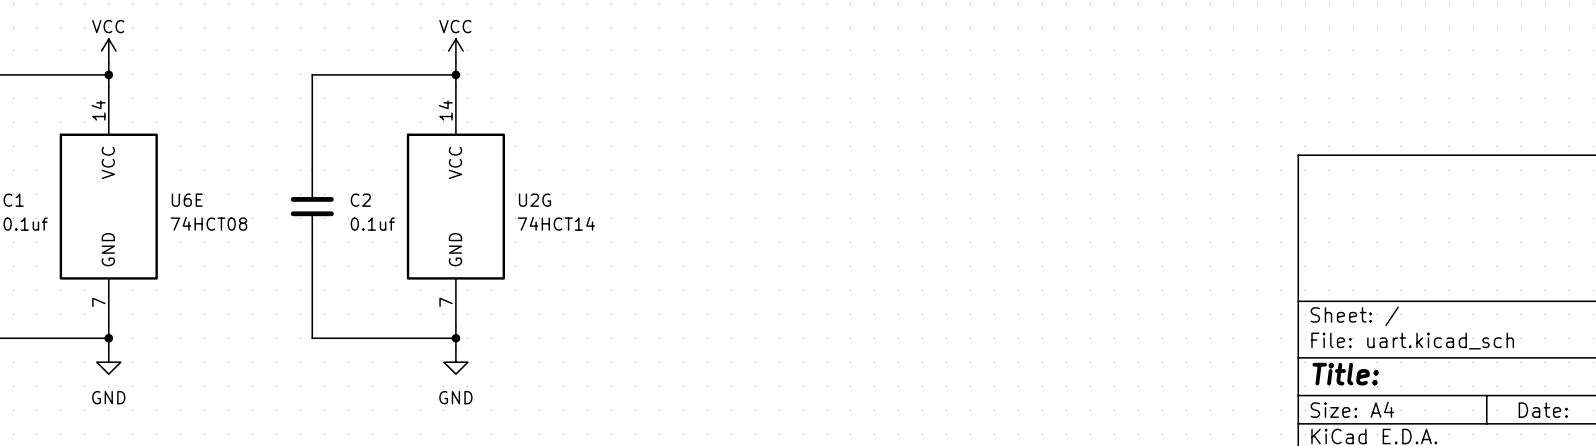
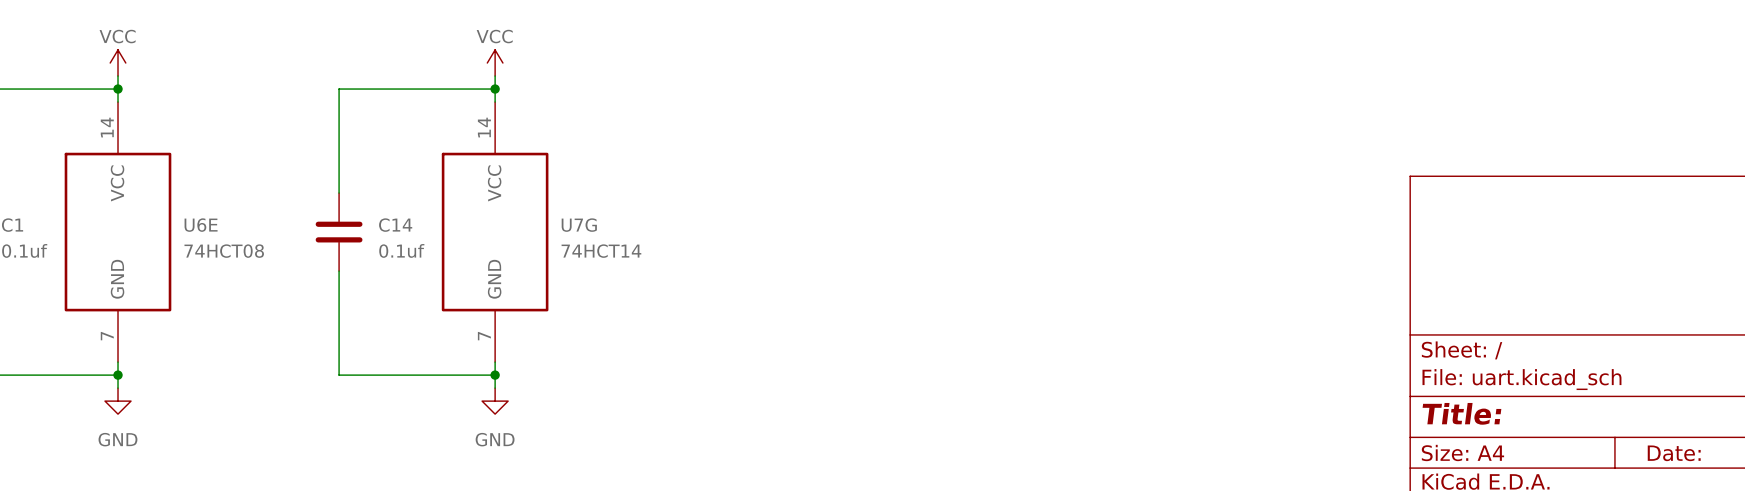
C2 name: C2 (360, 200) -> C14 (395, 225)
U2G name: U2G (534, 200) -> U7G (579, 225)

